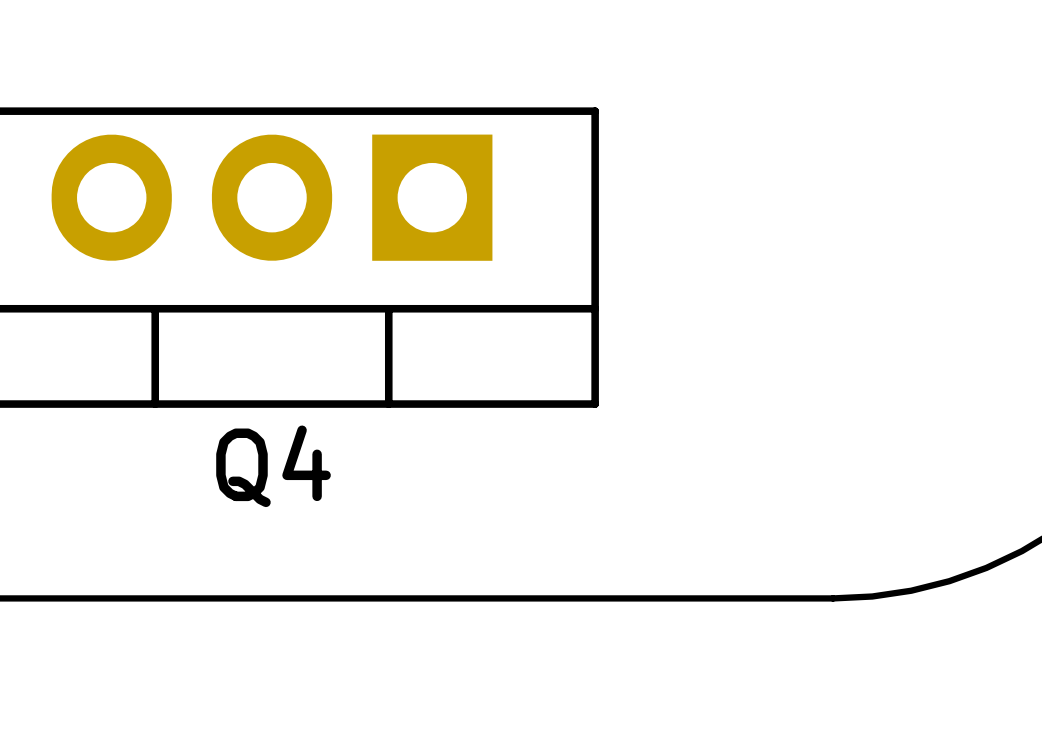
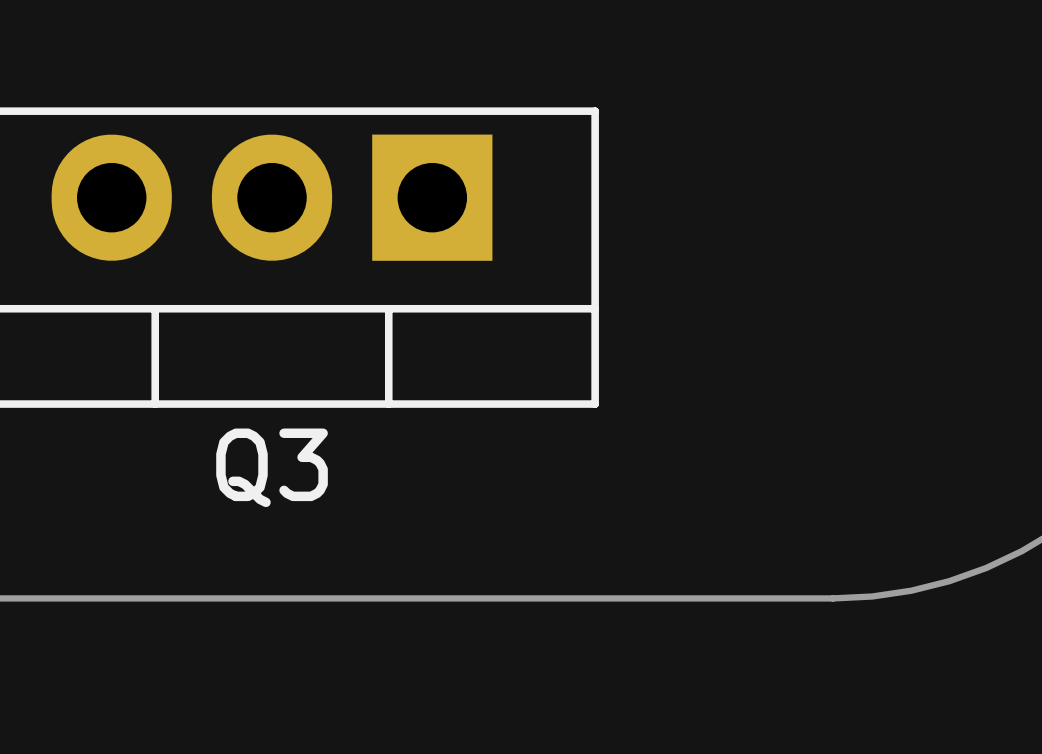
Q4 name: Q4 (273, 466) -> Q3 (272, 467)

